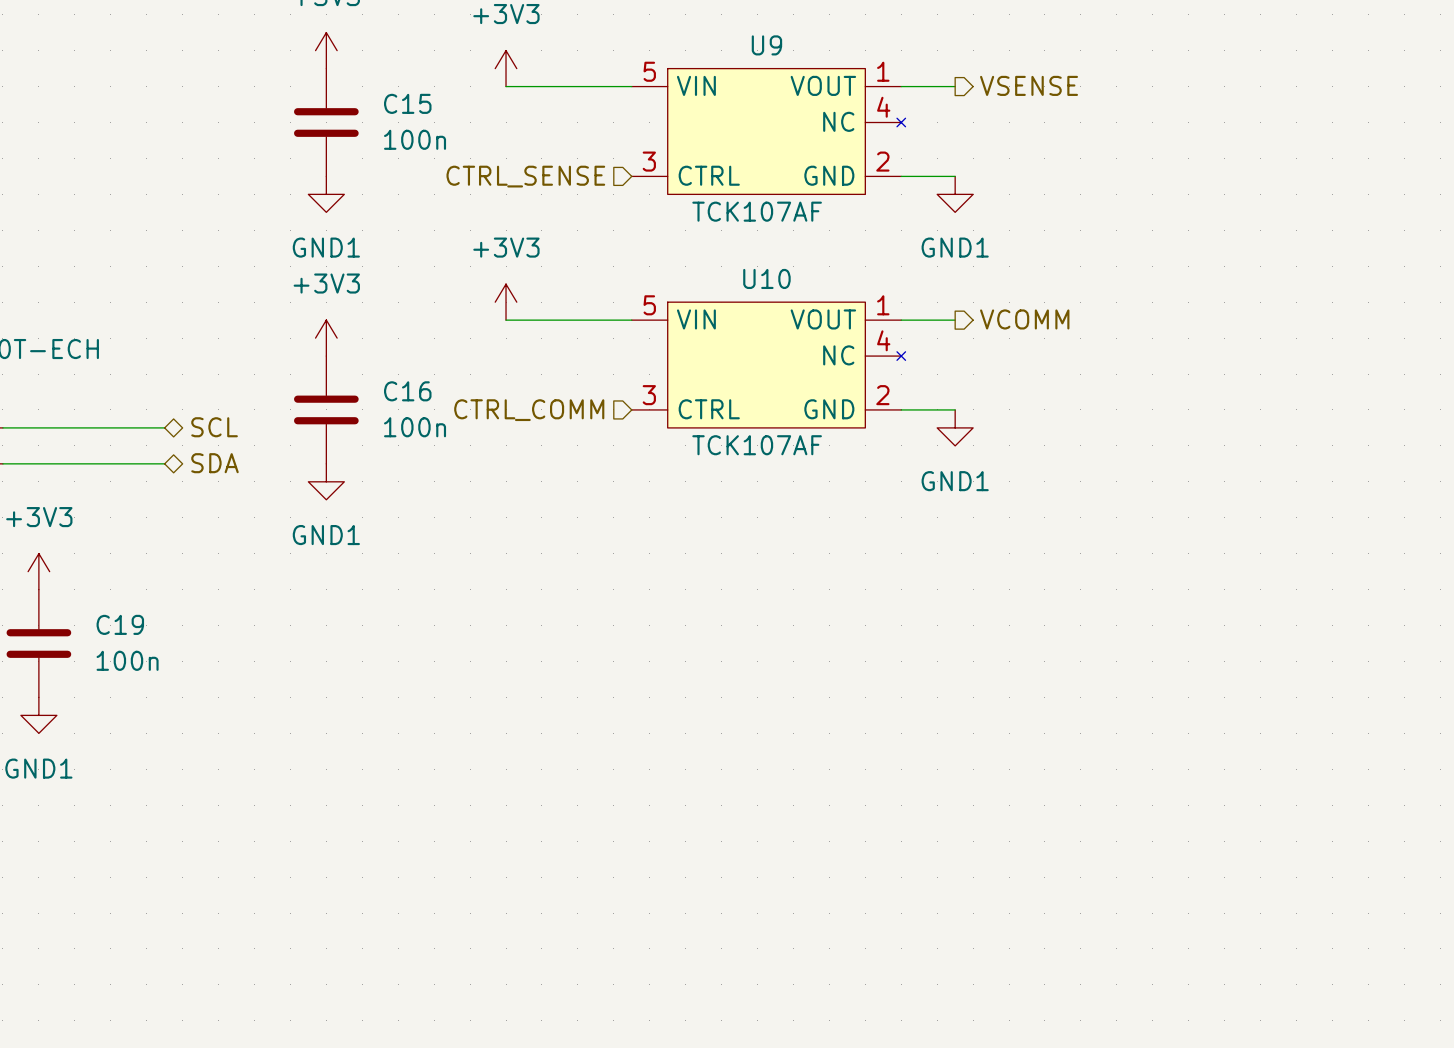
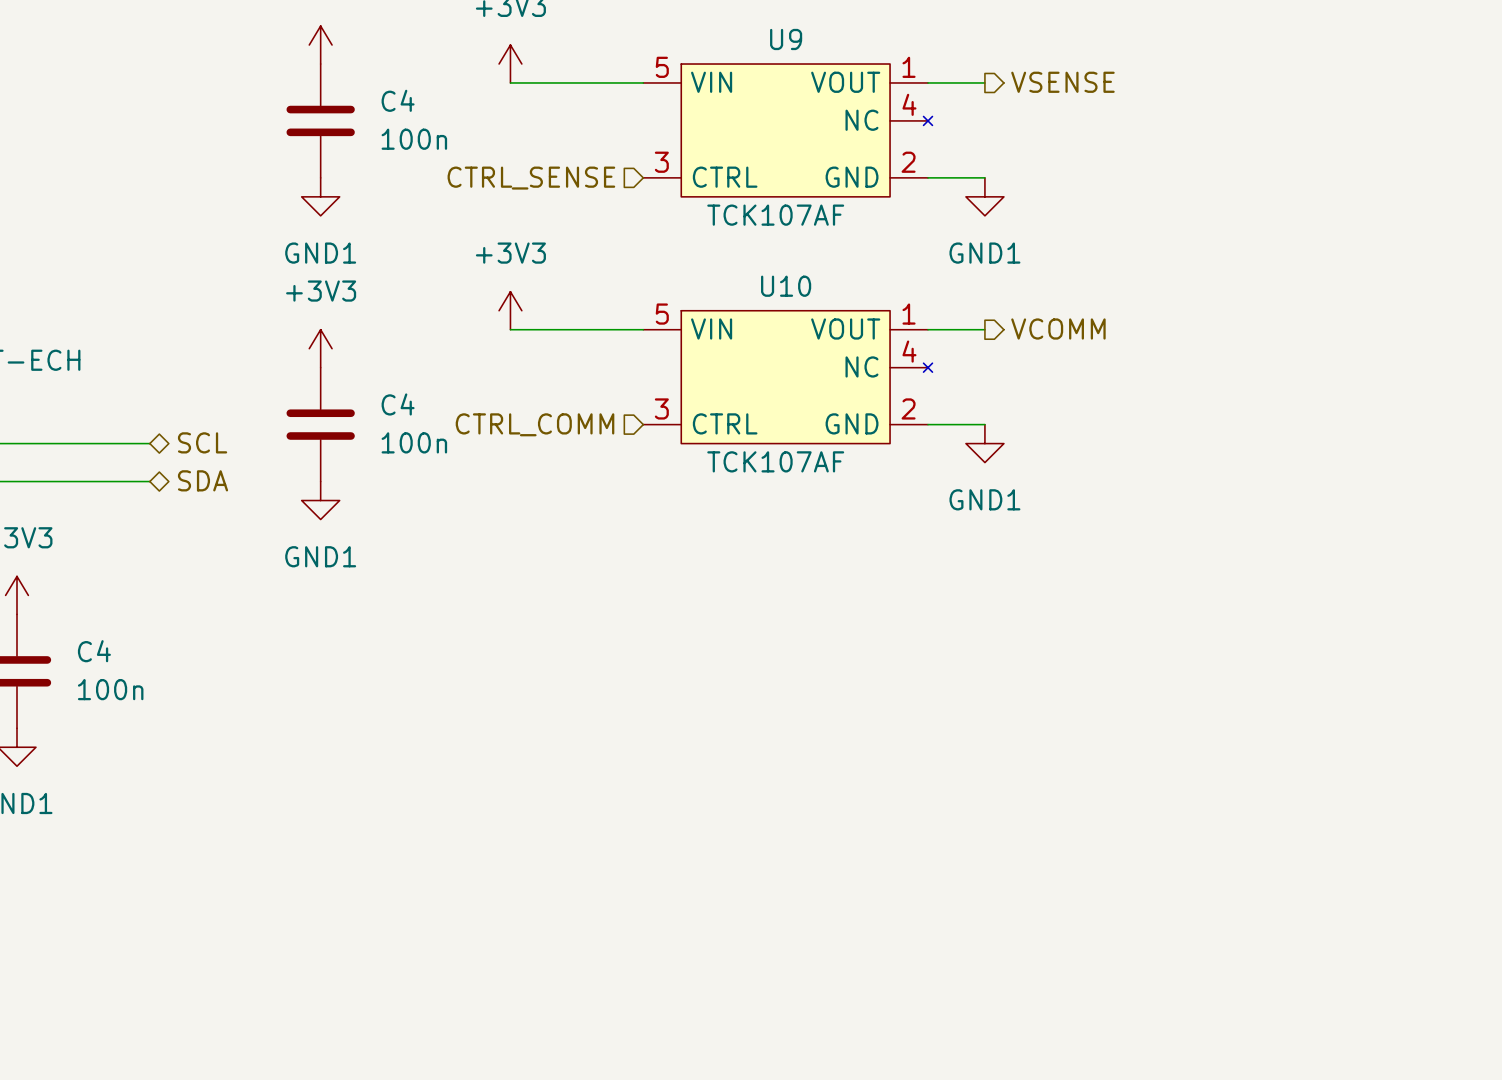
C15 name: C15 (407, 103) -> C4 (398, 100)
C16 name: C16 (407, 391) -> C4 (398, 404)
C19 name: C19 (120, 624) -> C4 (94, 651)

